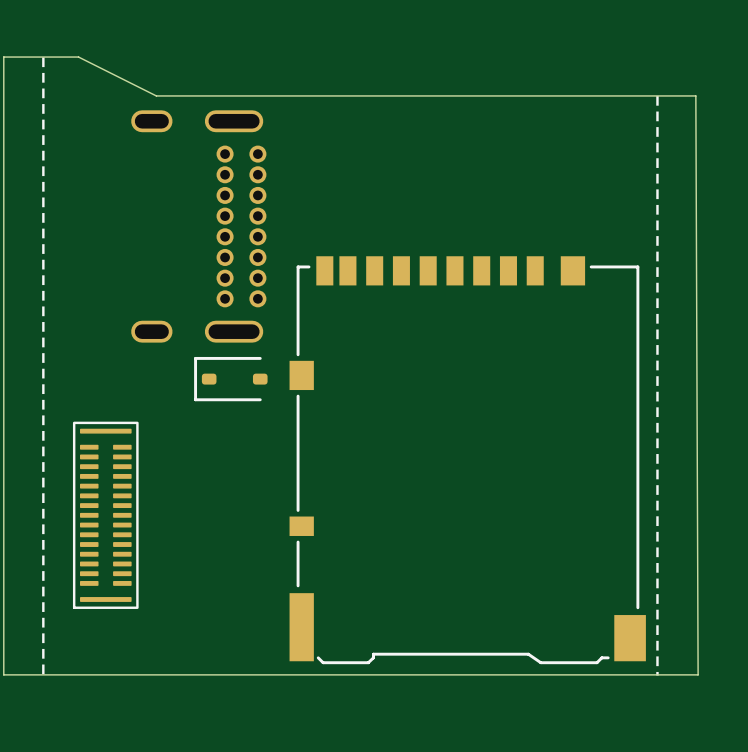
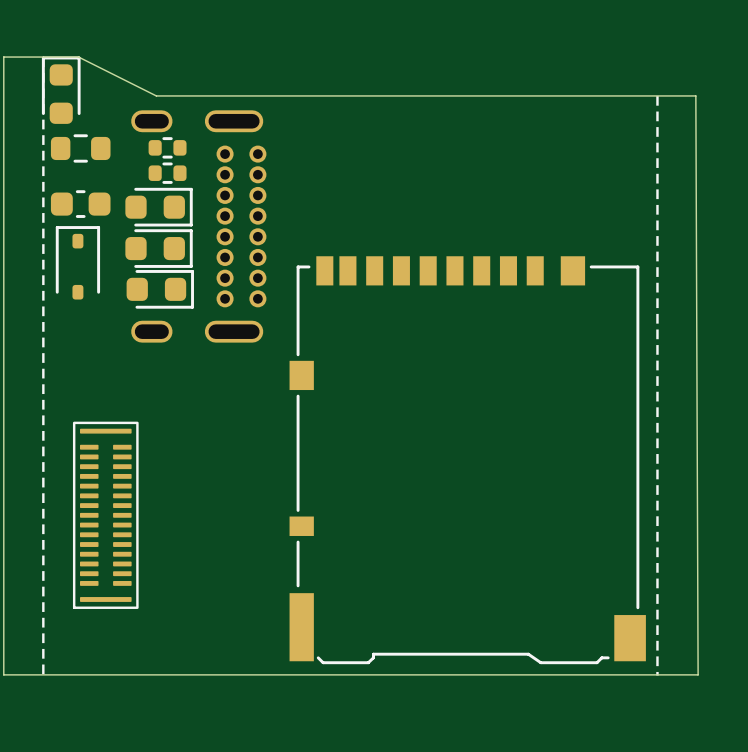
part: none -> (61, 90)
part: none -> (167, 147)
part: none -> (80, 148)
part: none -> (167, 173)
part: none -> (80, 204)
part: none -> (159, 207)
part: none -> (159, 248)
part: none -> (160, 289)
part rotation: 0° (230, 379) -> 90° clockwise (77, 262)
part position: (230, 379) -> (77, 262)

